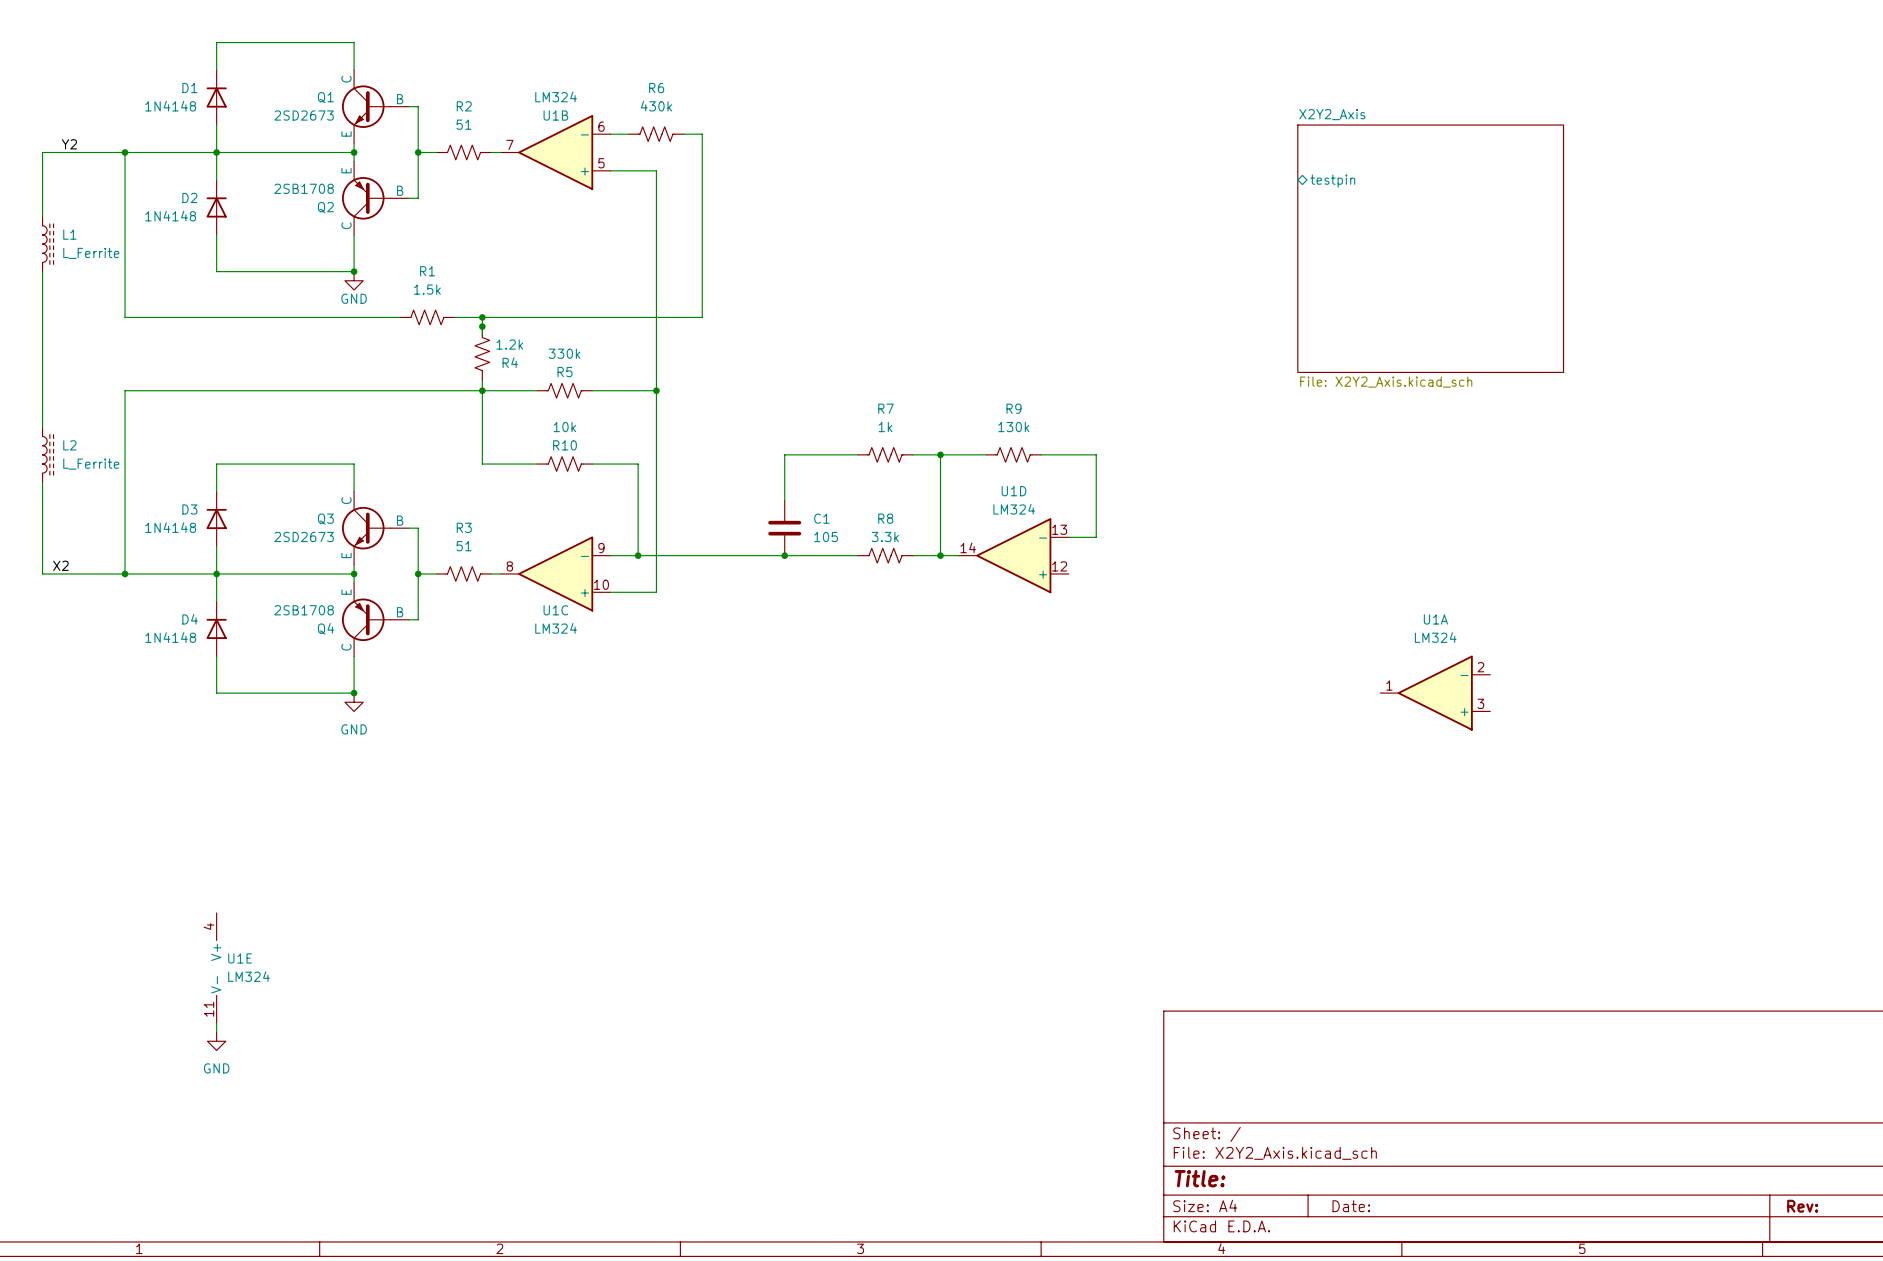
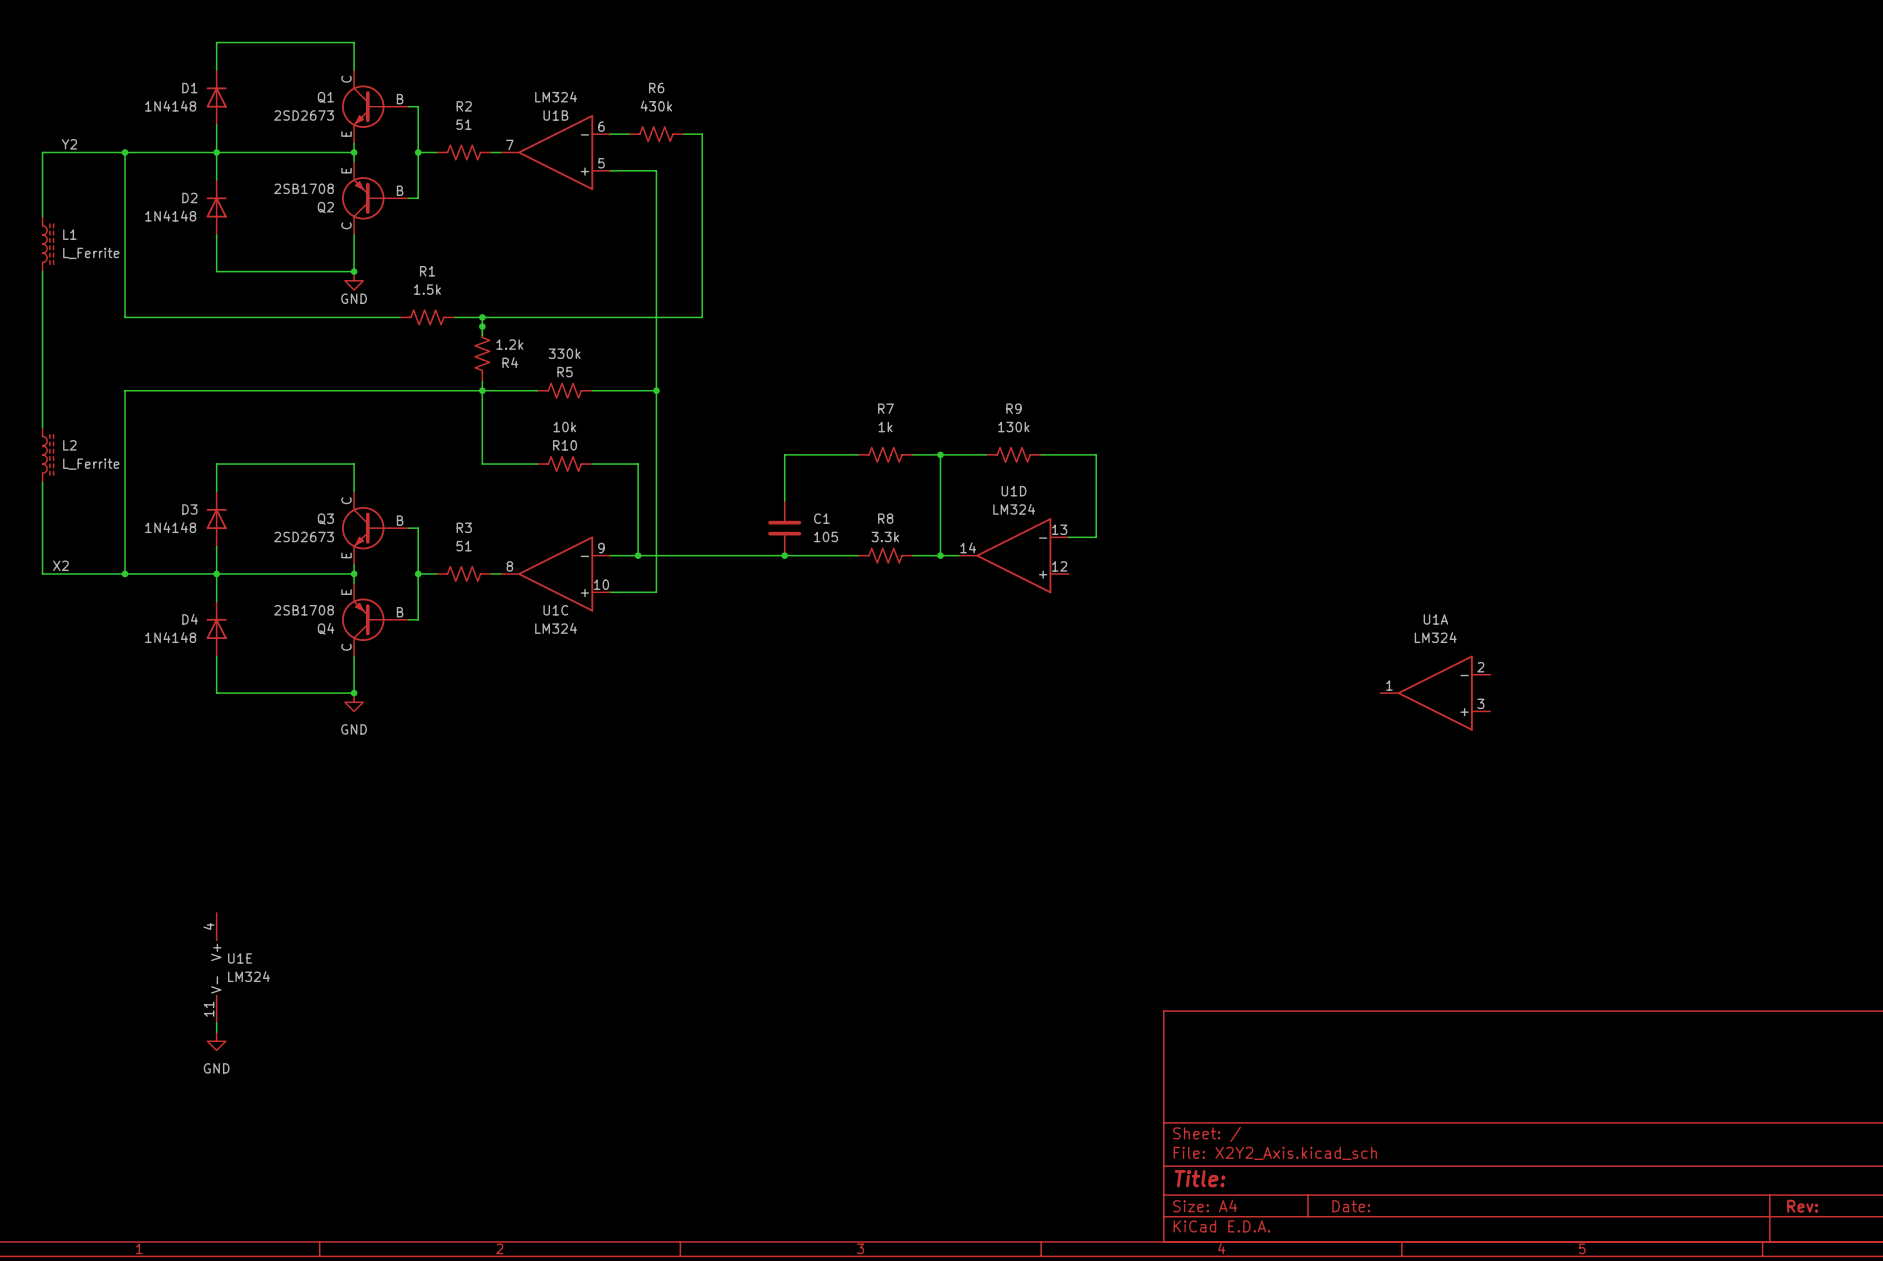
sheet pin: testpin (1332, 181) -> none
sheet X2Y2_Axis: File: X2Y2_Axis.kicad_sch (1430, 248) -> none

